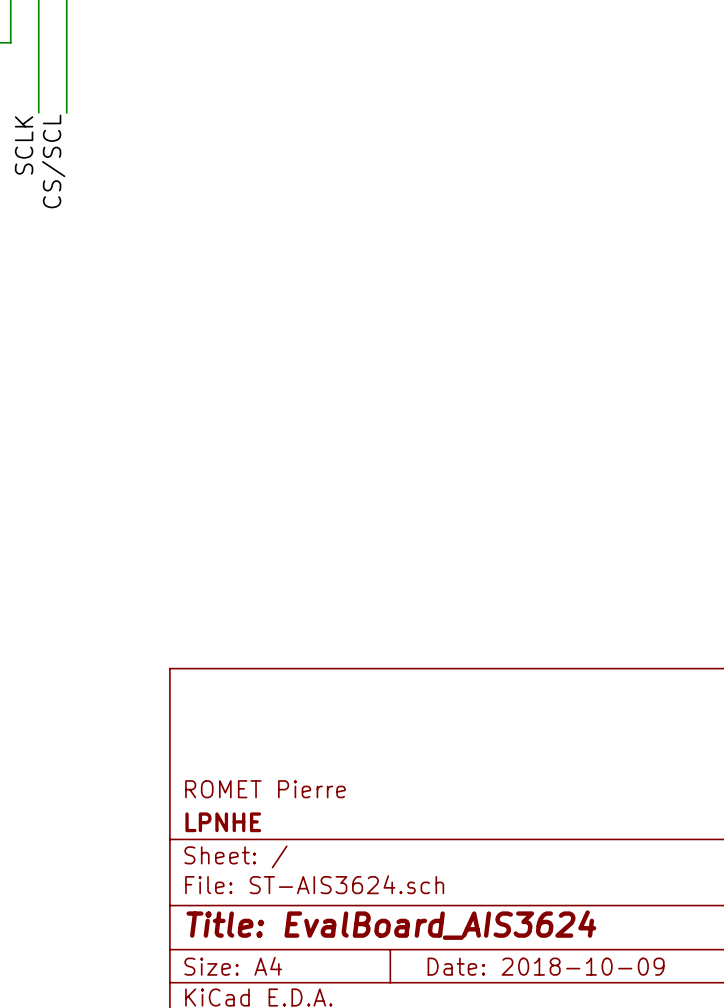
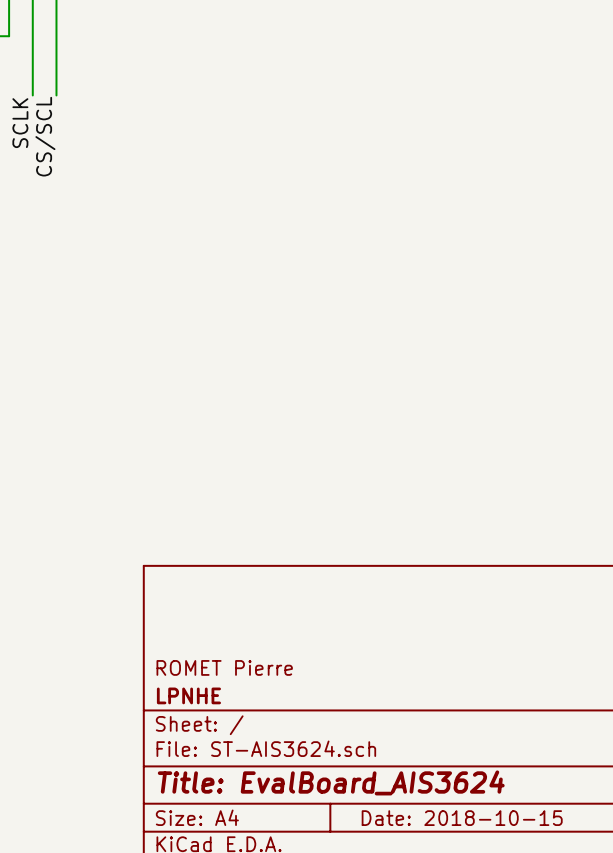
title block: Date: 2018-10-09 (546, 966) -> Date: 2018-10-15 (462, 818)

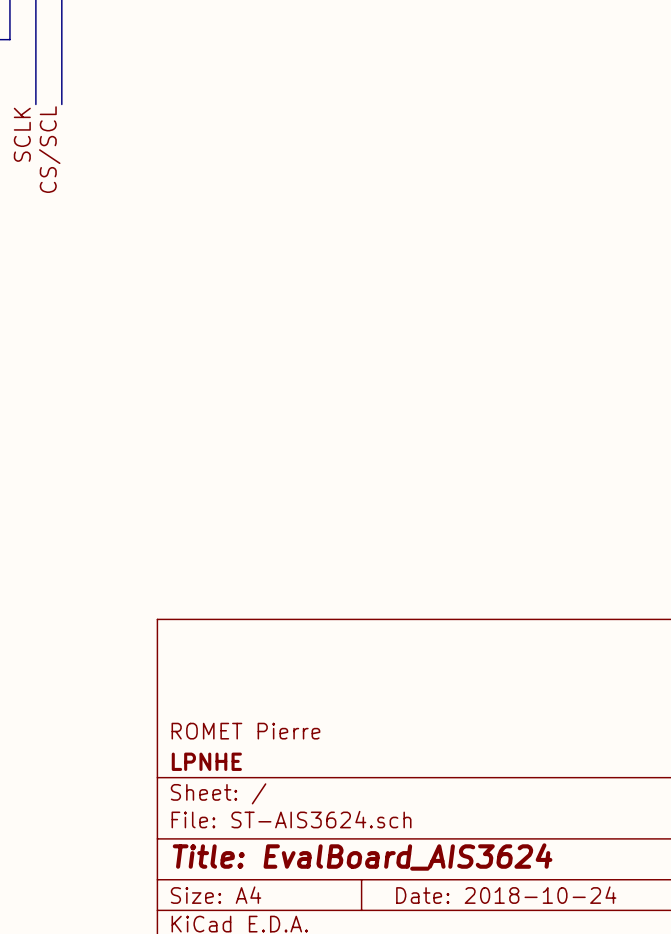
title block: Date: 2018-10-15 (462, 818) -> Date: 2018-10-24 (506, 895)

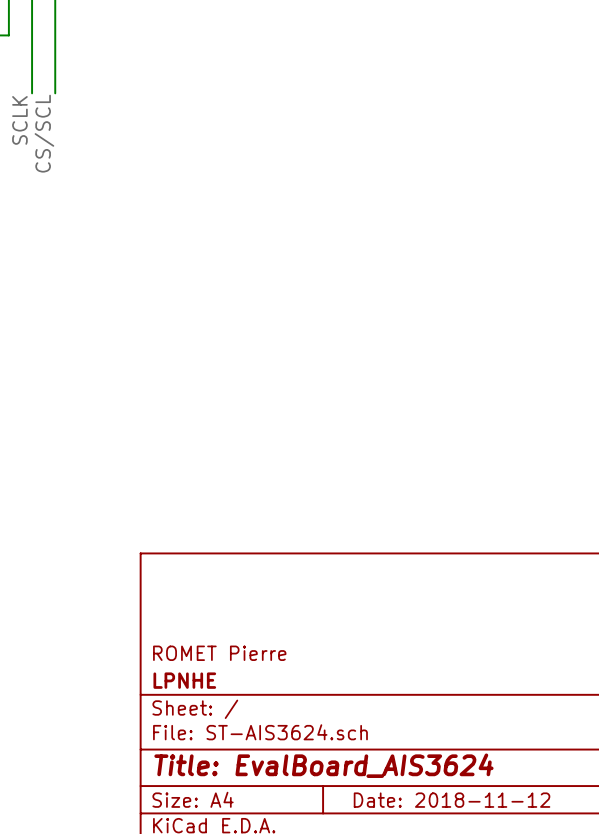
title block: Date: 2018-10-24 (506, 895) -> Date: 2018-11-12 (452, 800)

